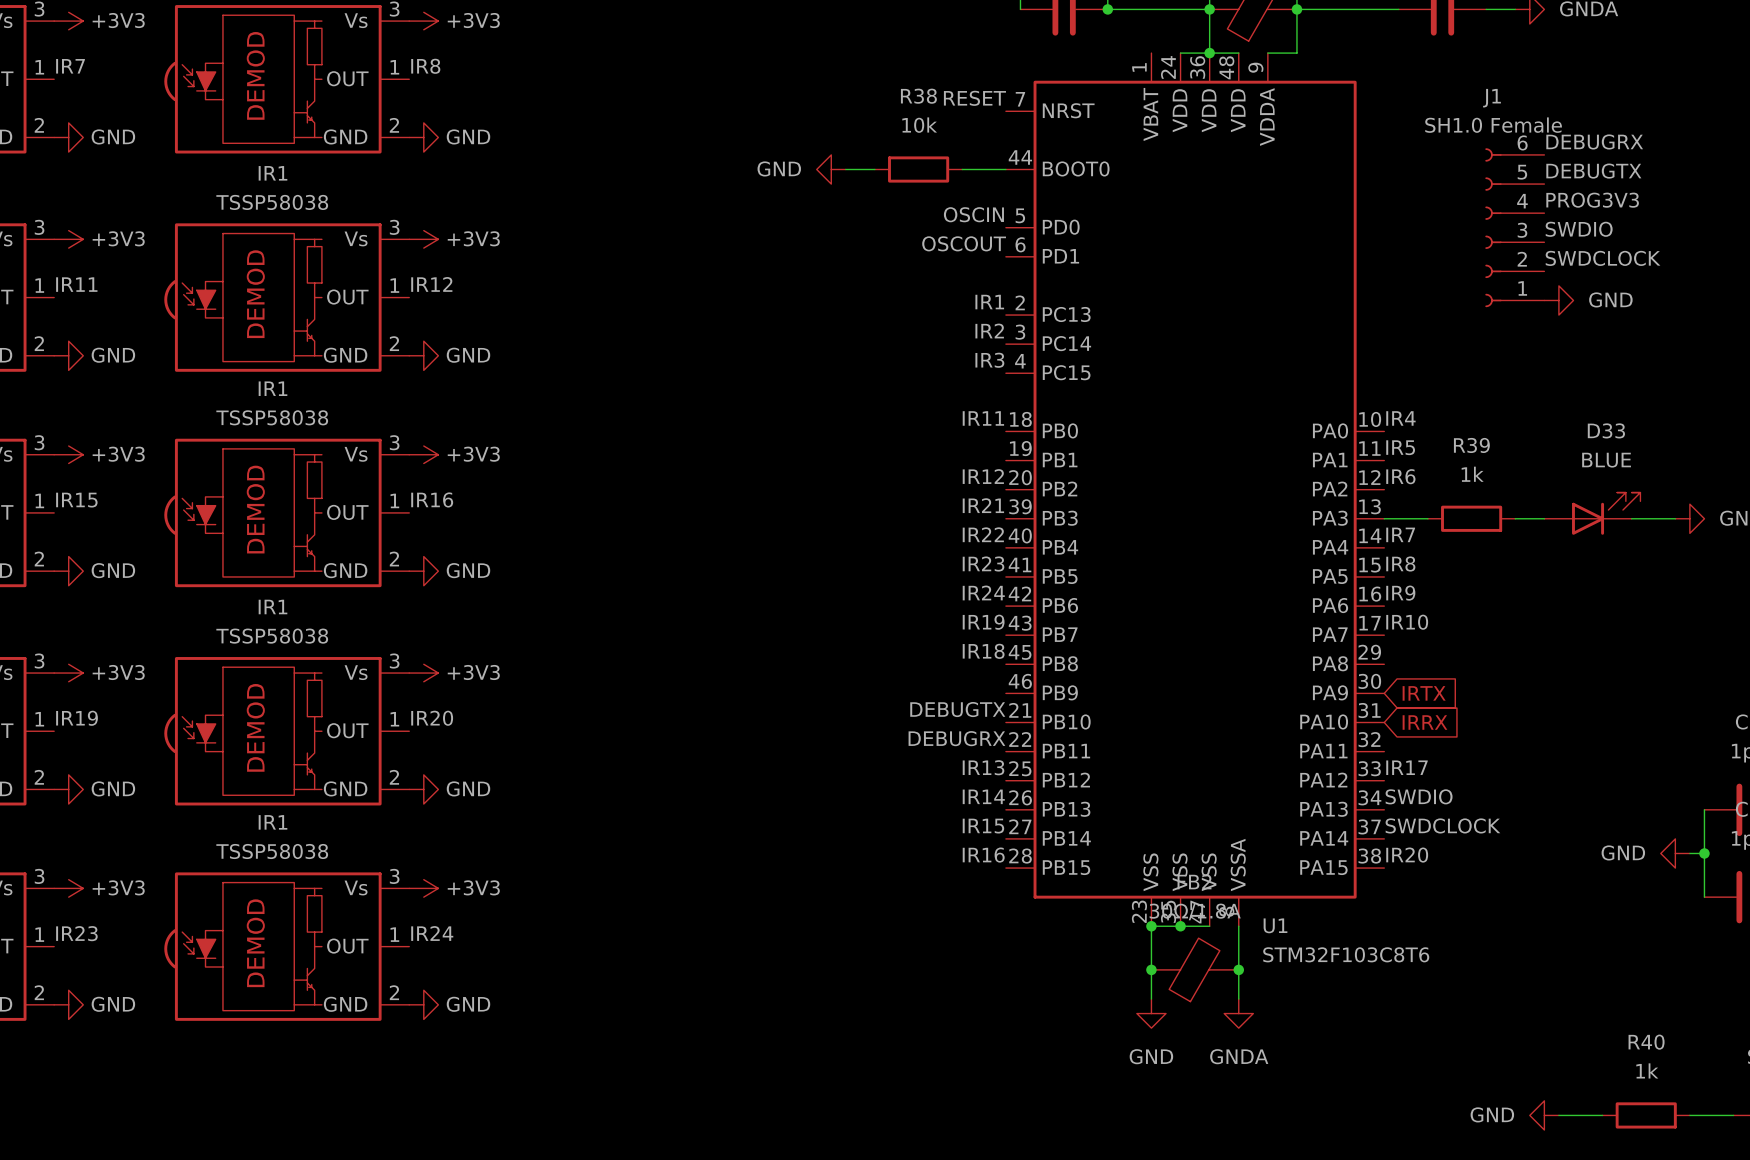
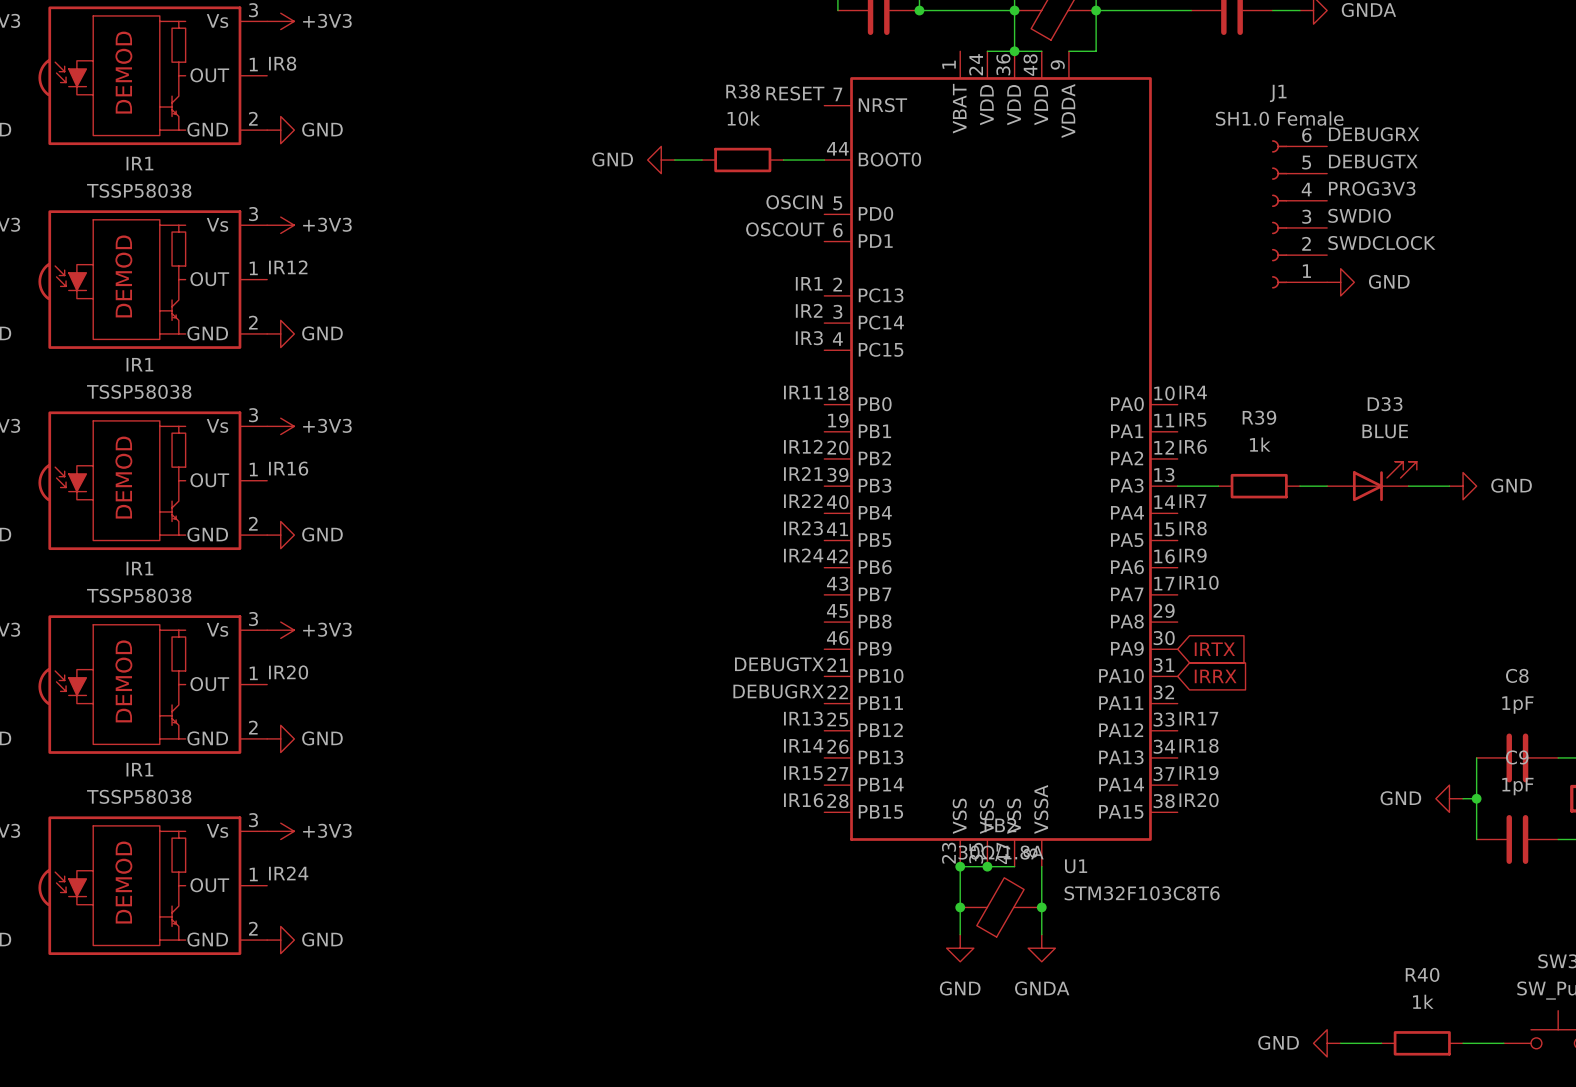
label: IR19 (983, 622) -> none
label: IR18 (983, 651) -> none
label: SWDIO (1419, 796) -> IR18 (1199, 745)
label: SWDCLOCK (1442, 825) -> IR19 (1199, 773)

